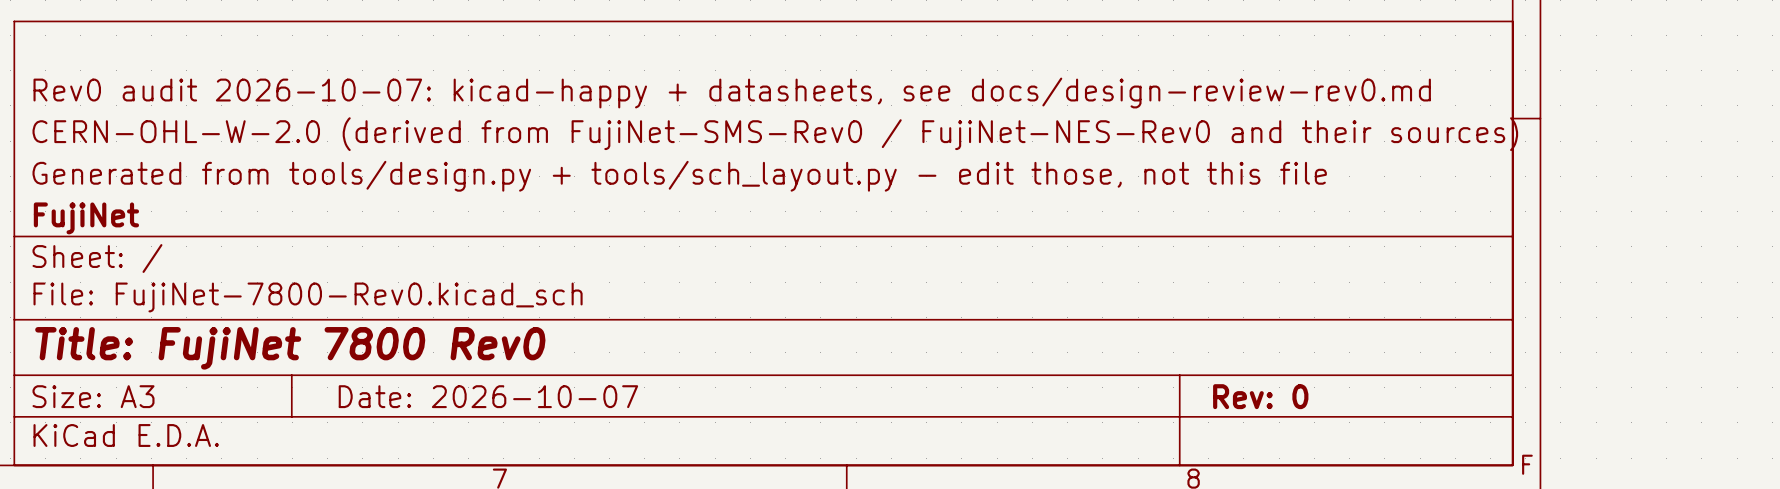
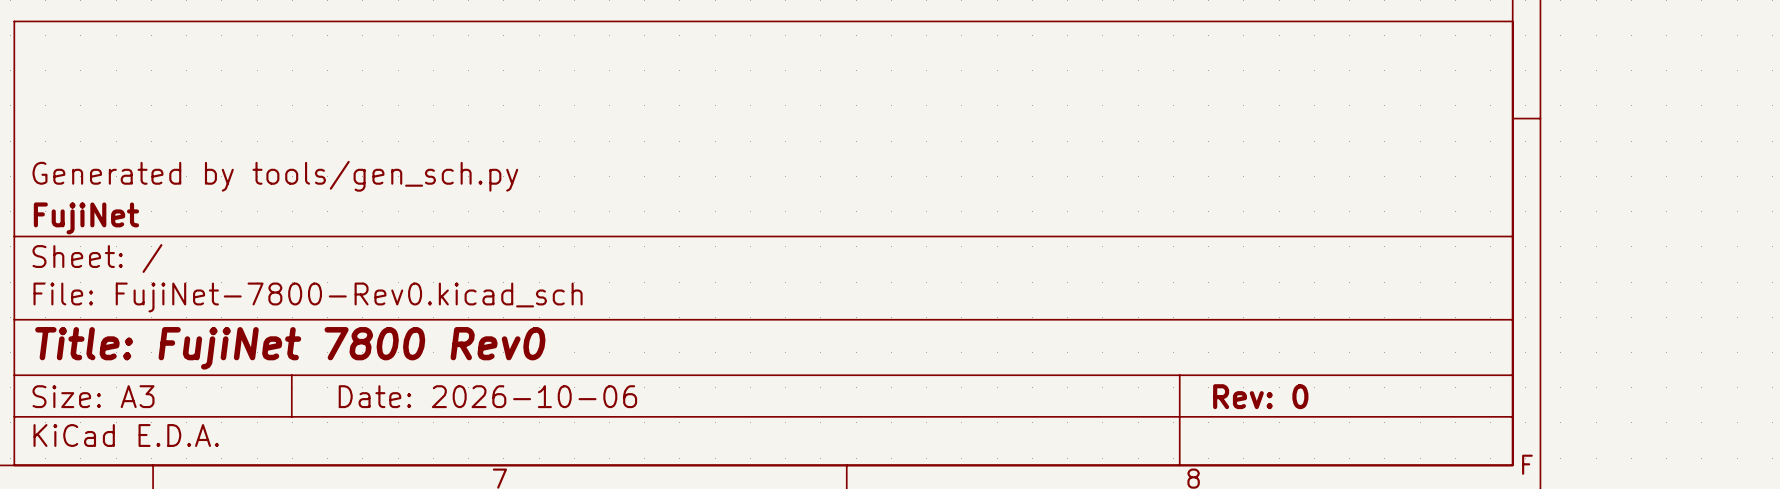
title block: Rev0 audit 2026-10-07: kicad-happy + datasheets, see docs/design-review-rev0.md (732, 93) -> none
title block: CERN-OHL-W-2.0 (derived from FujiNet-SMS-Rev0 / FujiNet-NES-Rev0 and their sources) (775, 134) -> none
title block: Generated from tools/design.py + tools/sch_layout.py - edit those, not this file (679, 176) -> Generated by tools/gen_sch.py (275, 176)
title block: Date: 2026-10-07 (488, 396) -> Date: 2026-10-06 (487, 396)

